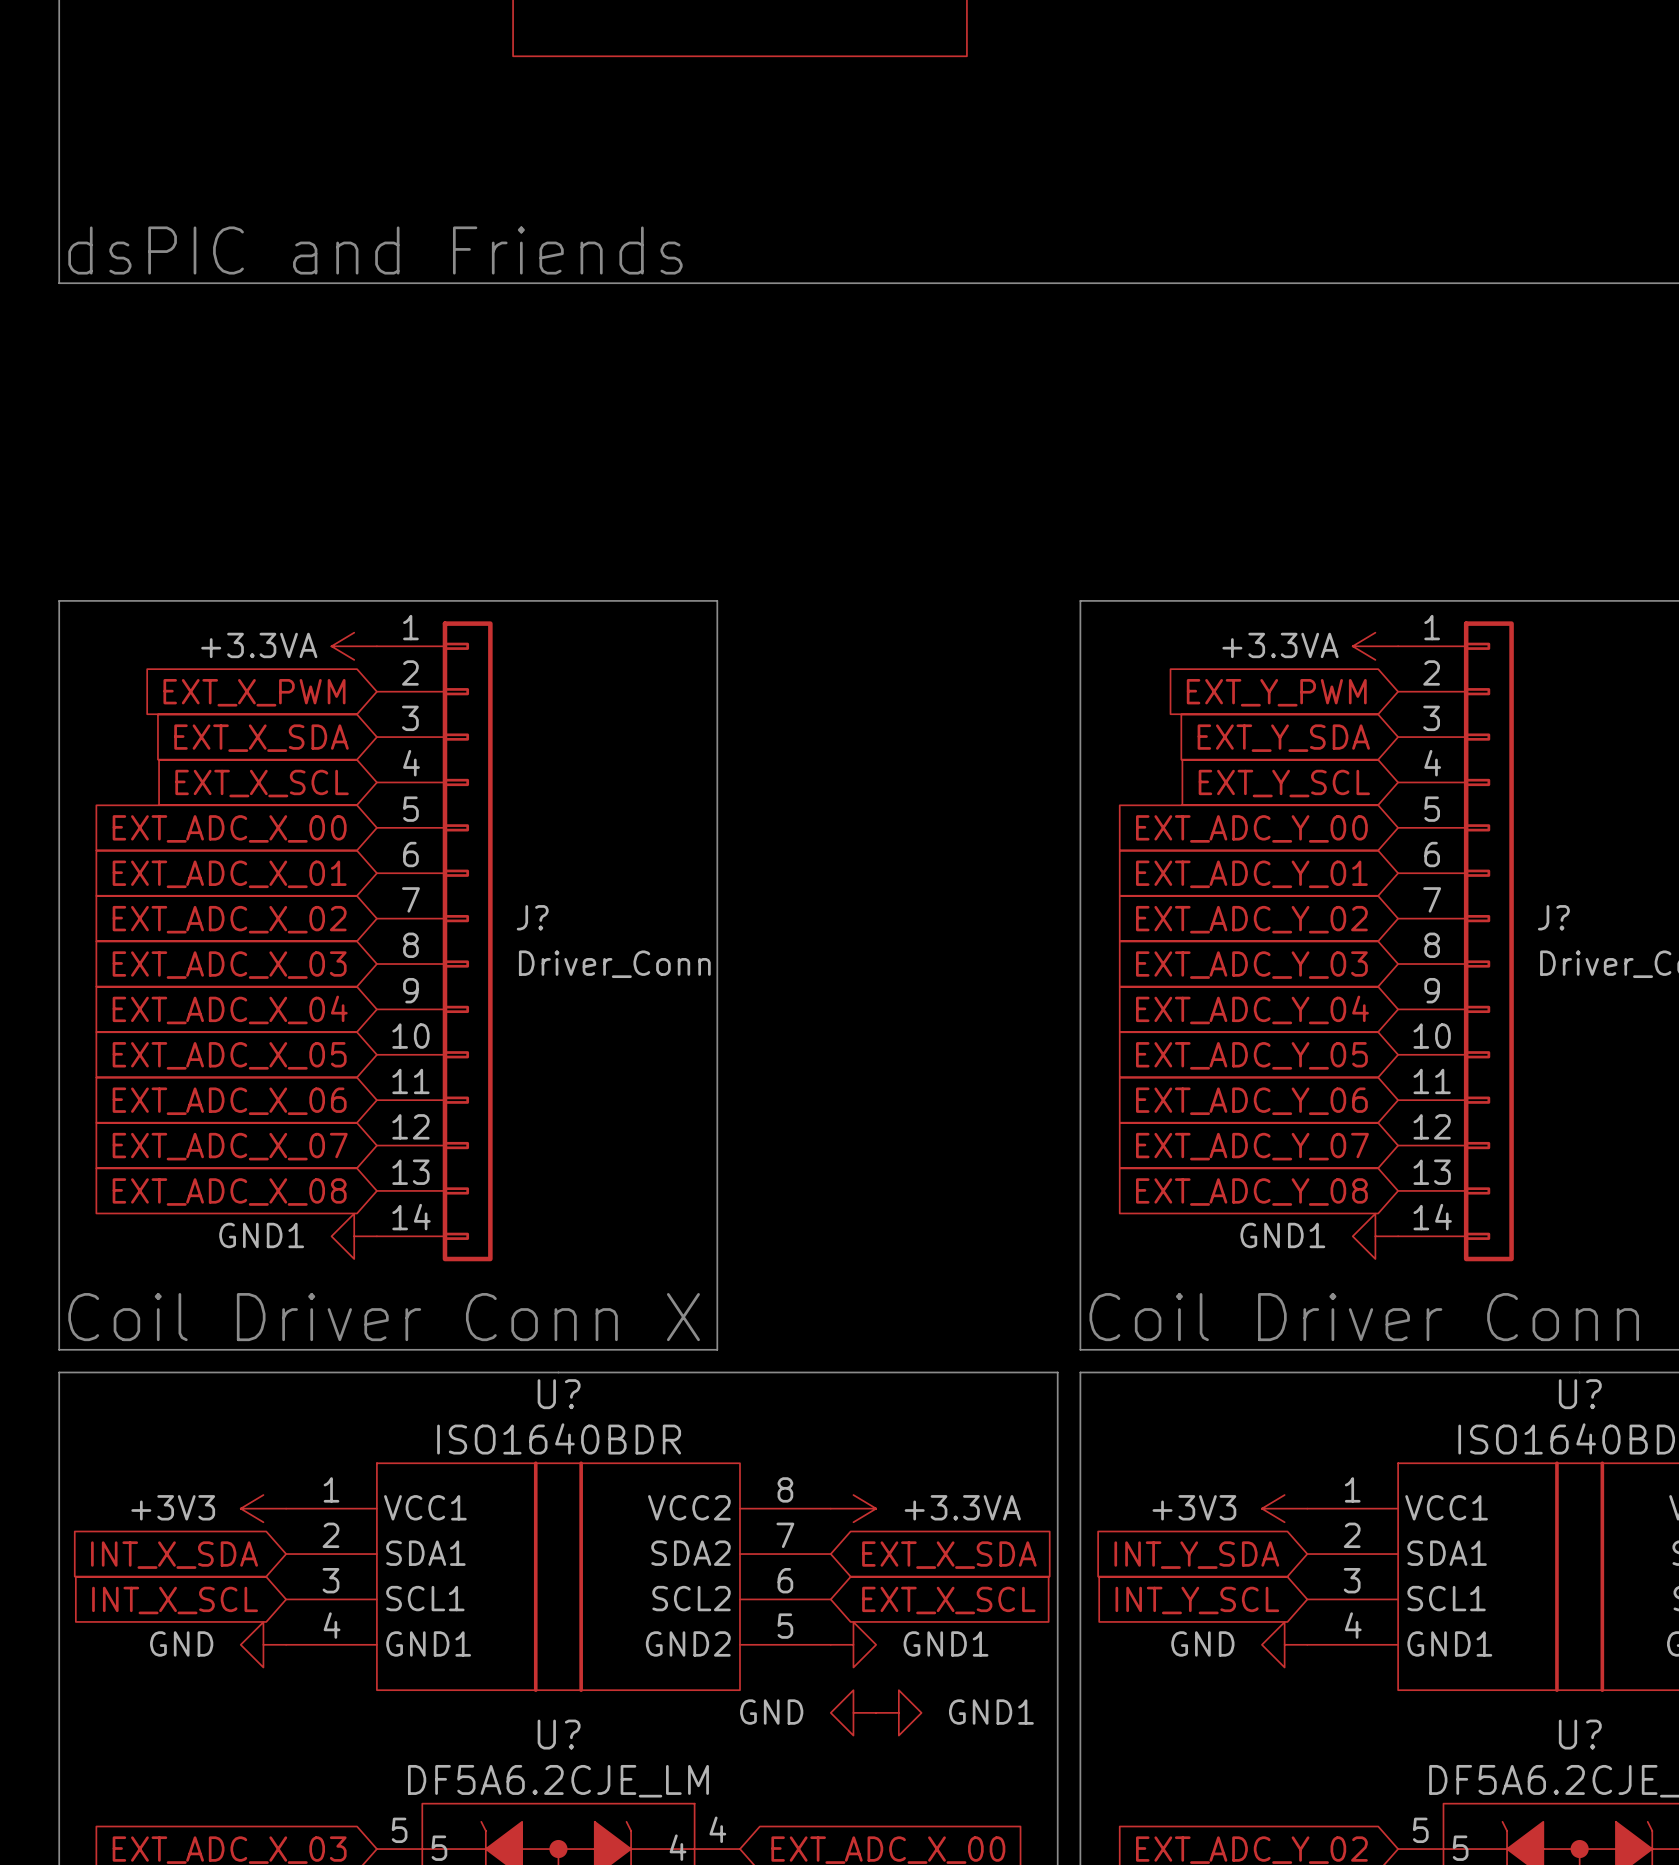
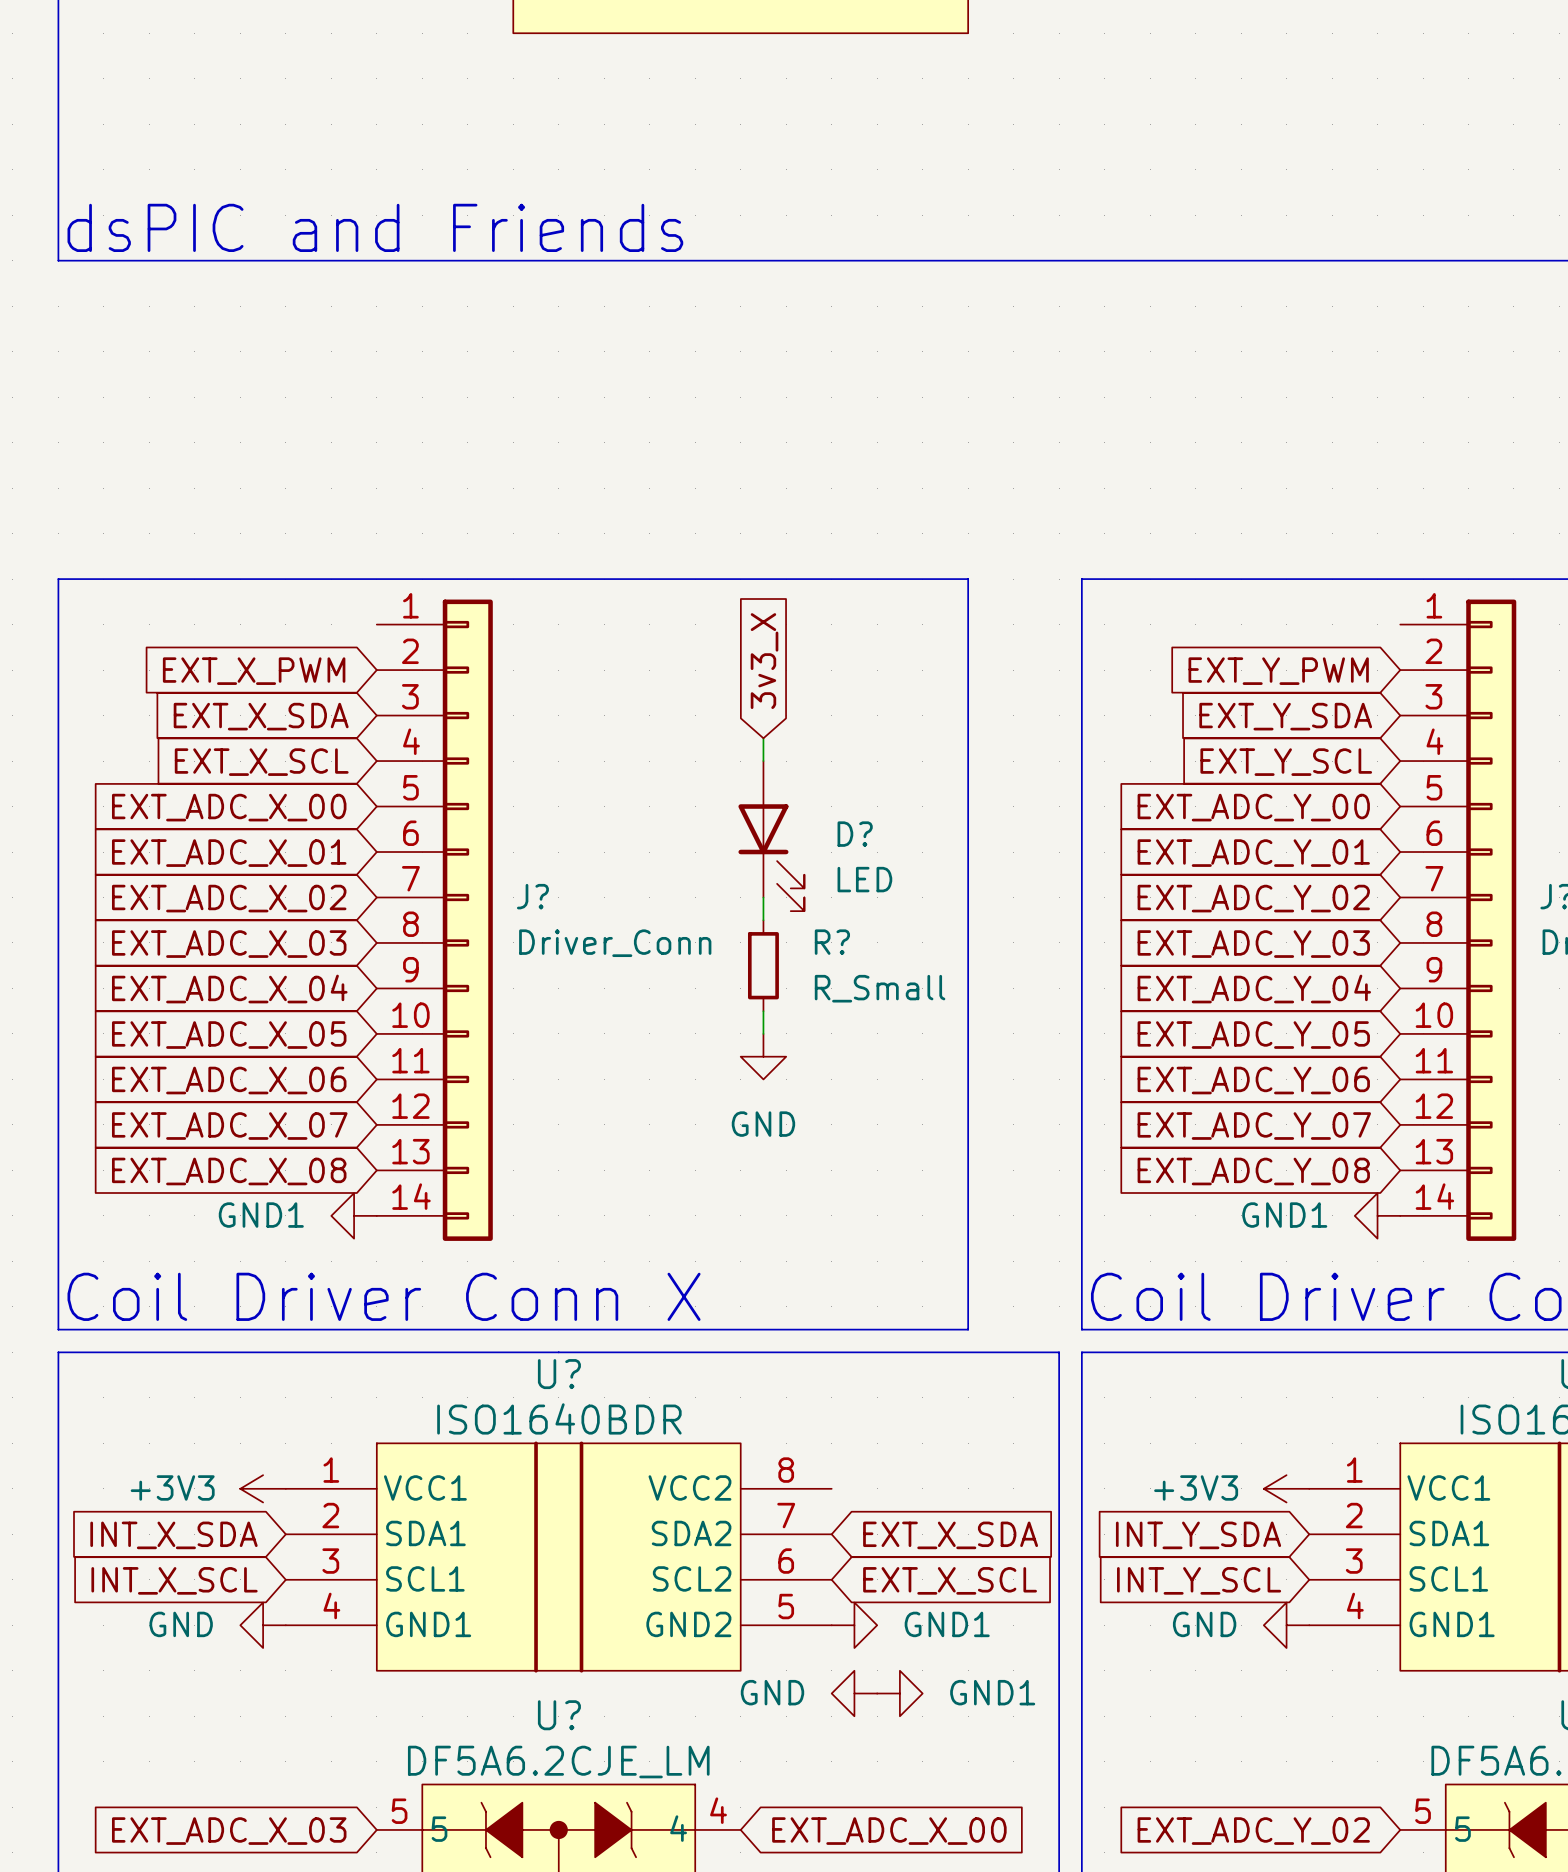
line: (717, 600) (717, 1349) -> (717, 579) (968, 579) (968, 1329) (717, 1329)
power symbol: +3.3VA (354, 646) -> none
power symbol: +3.3VA (1375, 646) -> none
global label: none -> 3v3_X (764, 661)
wire: none -> (763, 738) (763, 761)
D?: none -> LED (771, 836)
wire: none -> (763, 897) (763, 920)
R?: none -> R_Small (763, 965)
wire: none -> (763, 1011) (763, 1033)
power symbol: none -> GND (763, 1056)
power symbol: +3.3VA (853, 1508) -> none

